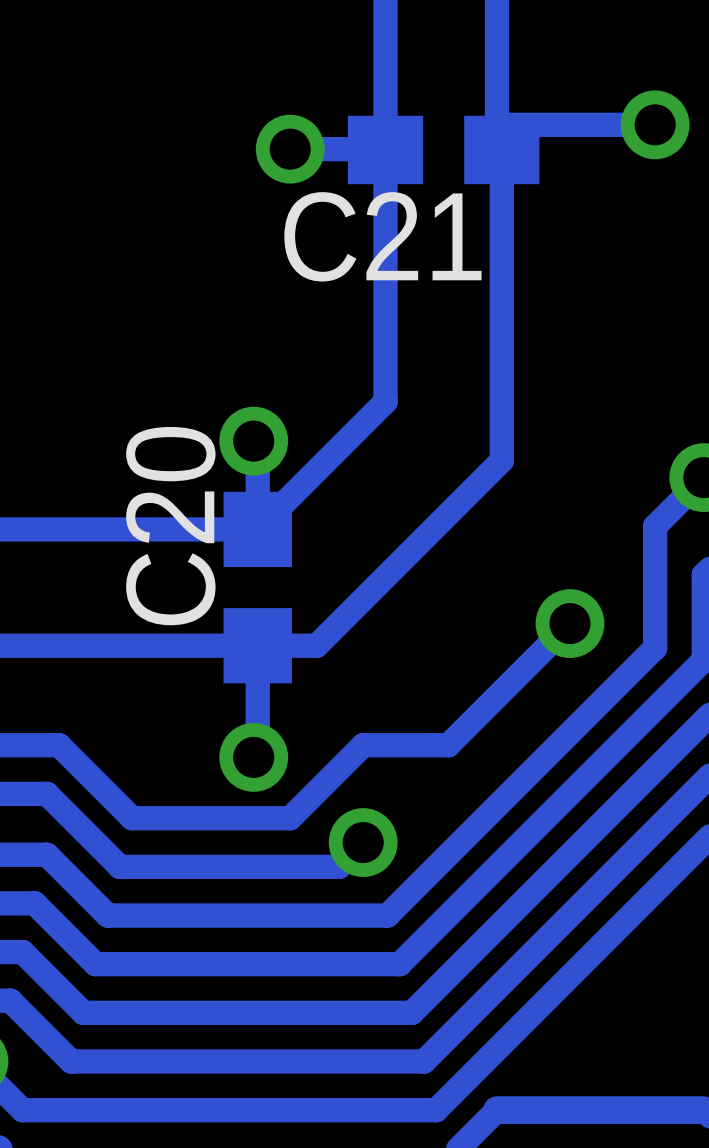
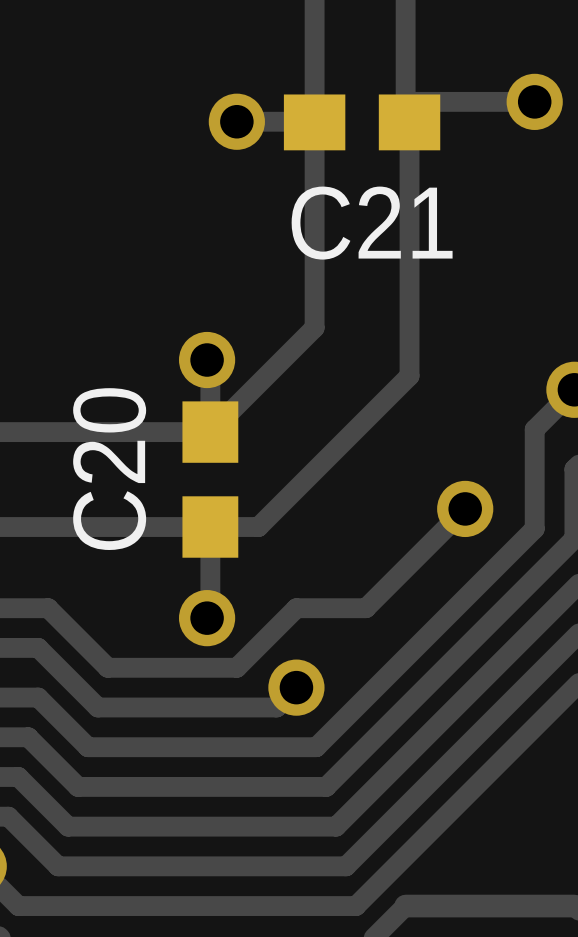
C21 name position: C21 (382, 236) -> C21 (372, 223)
C20 name position: C20 (170, 526) -> C20 (109, 469)

